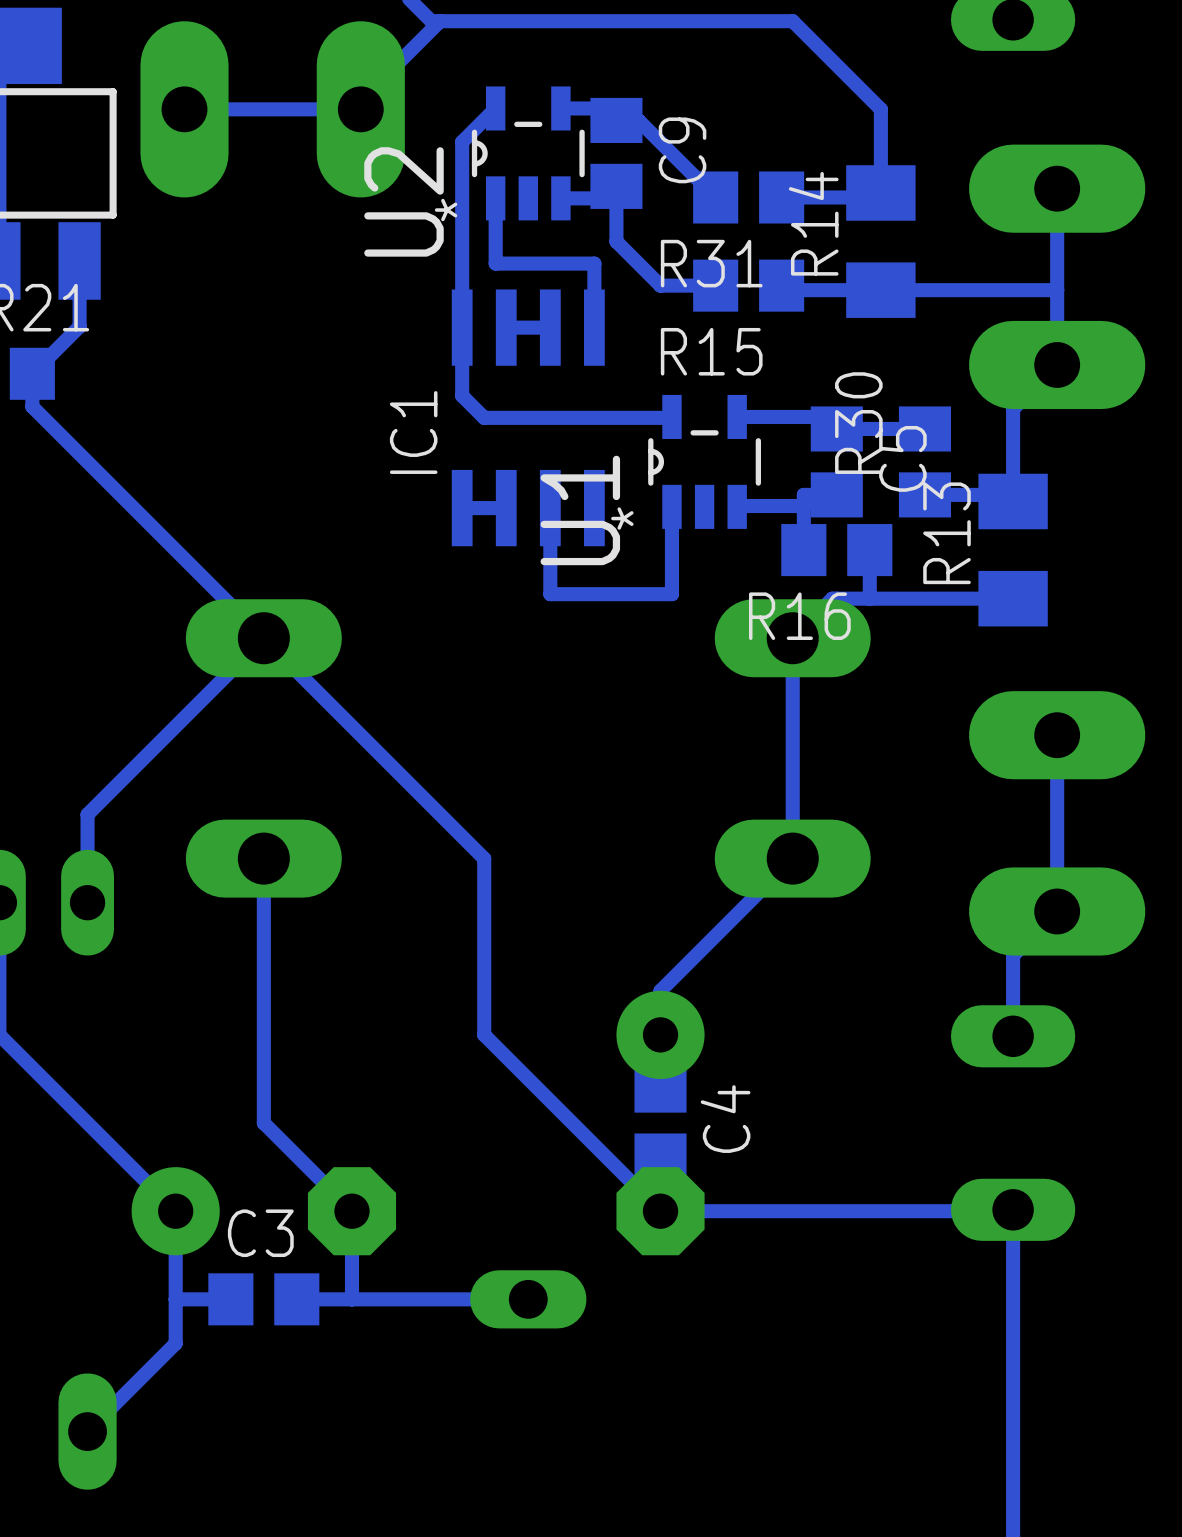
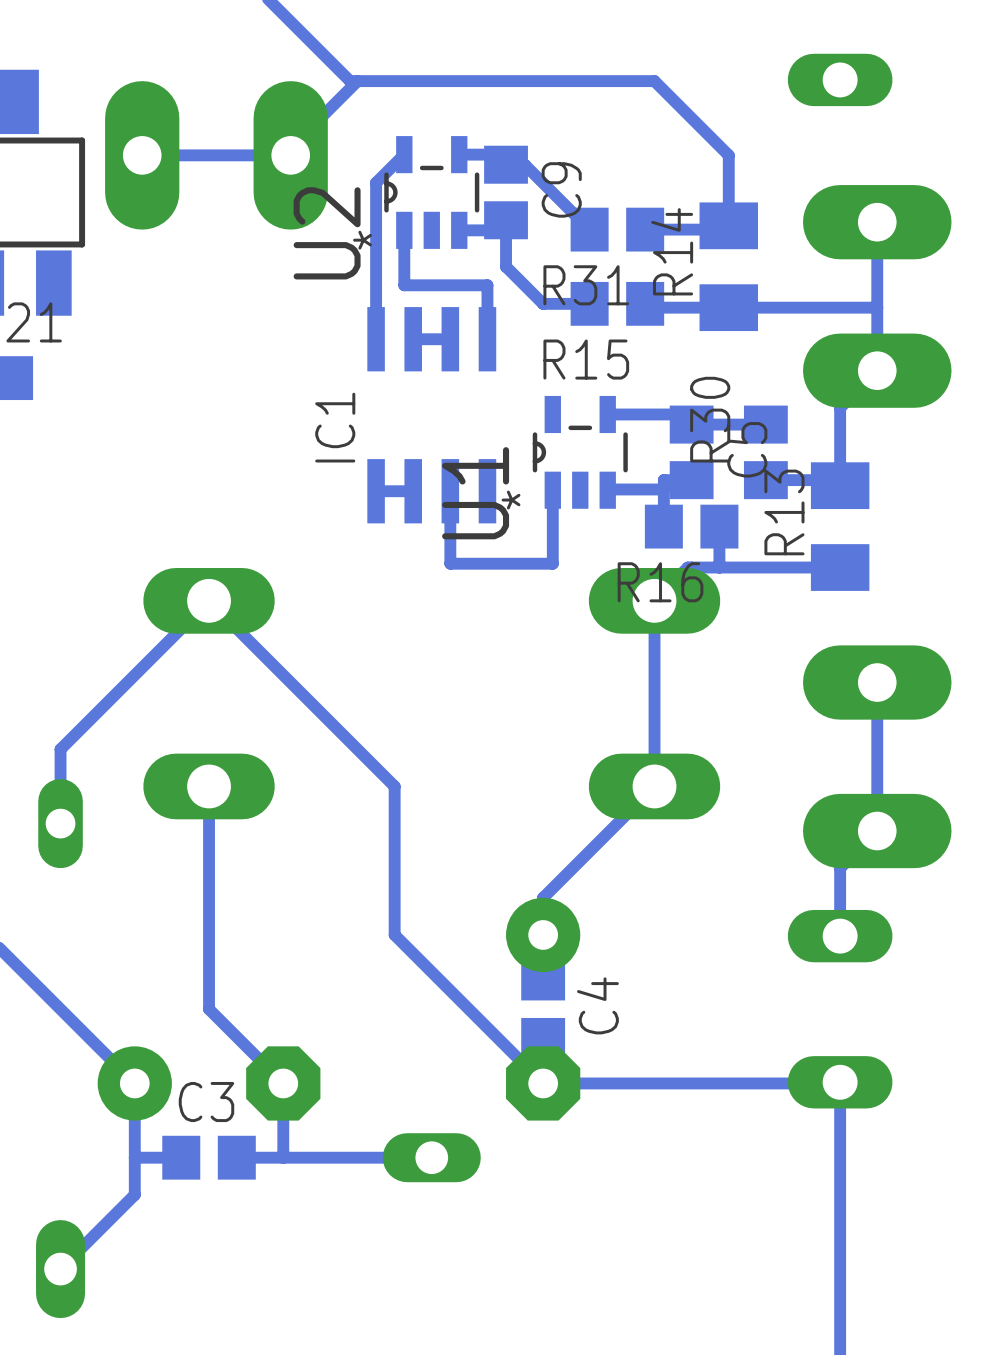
track: (79, 260) (79, 326) (32, 373) (32, 406) (263, 638) -> none
track: (462, 327) (462, 395) (484, 417) (671, 416) -> none

